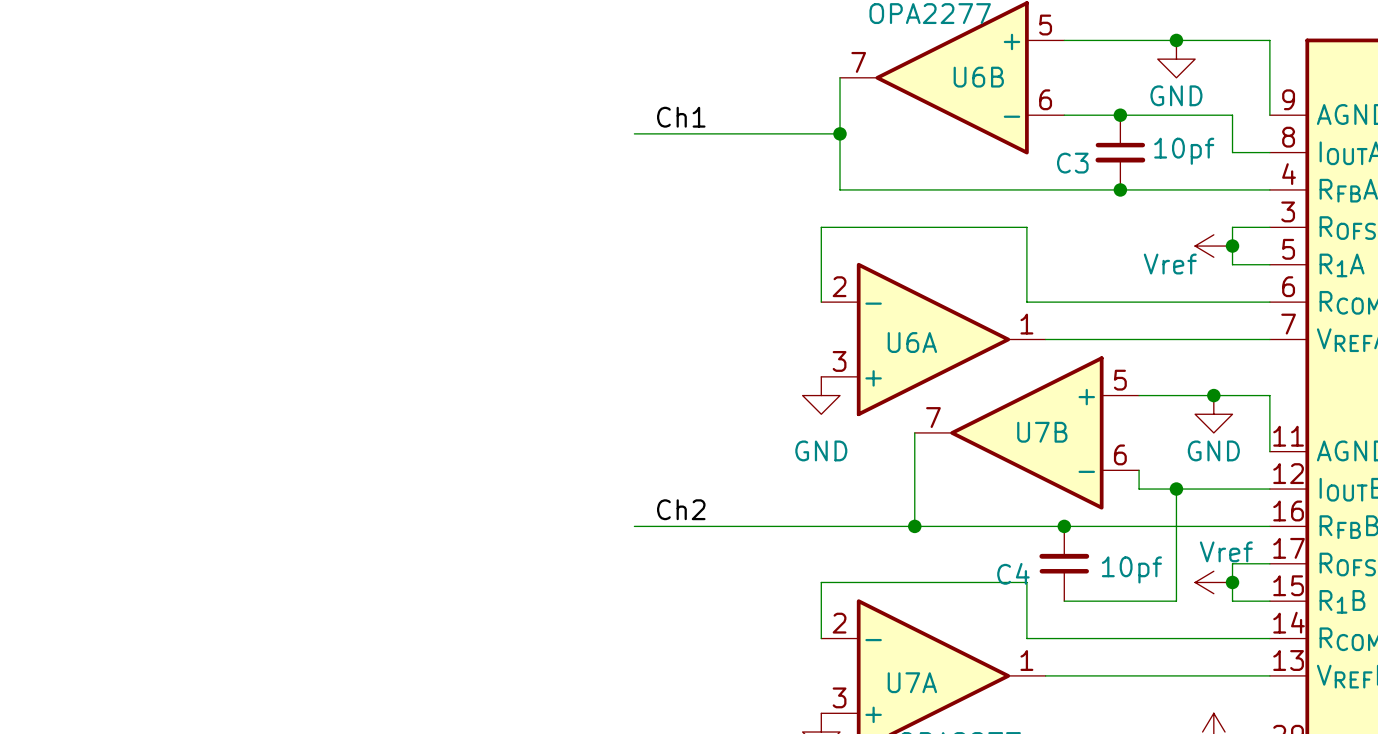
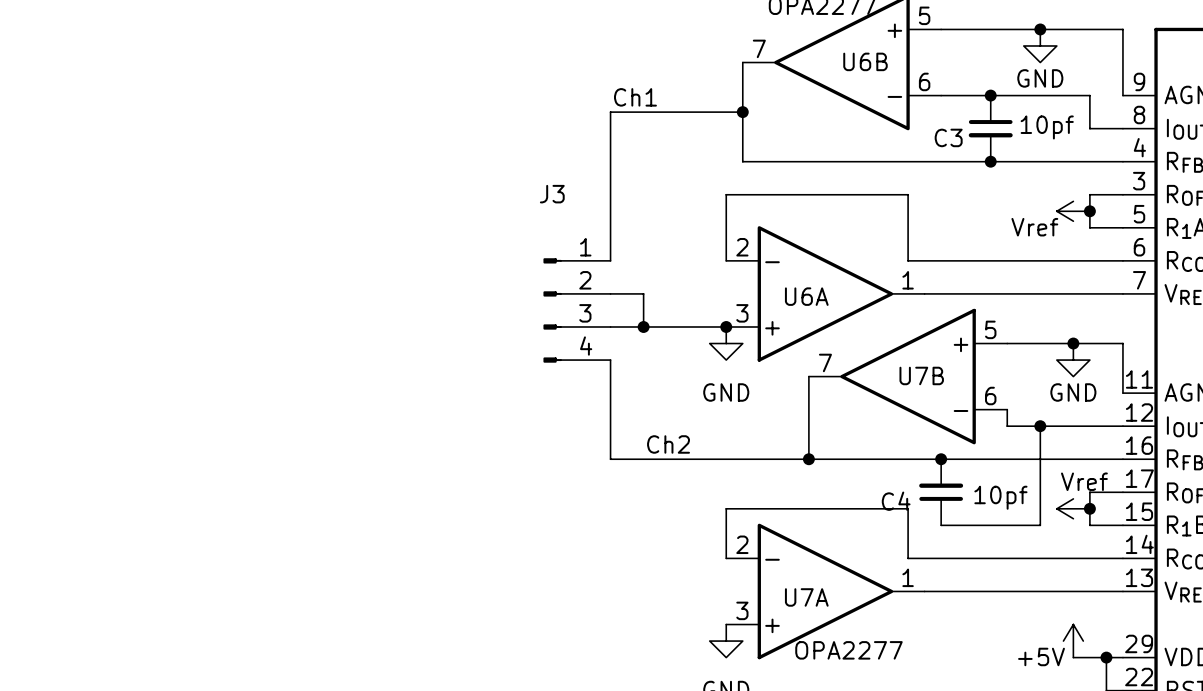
label position: Ch1 (681, 117) -> Ch1 (635, 97)
wire: (634, 133) (690, 133) -> (610, 260) (610, 112)
wire: none -> (610, 293) (643, 293) (643, 326)
J3: none -> (576, 310)
wire: none -> (610, 326) (726, 326)
junction: none -> (643, 326)
junction: none -> (726, 326)
label position: Ch2 (681, 509) -> Ch2 (668, 444)
wire: (634, 526) (690, 526) -> (610, 360) (610, 459)

